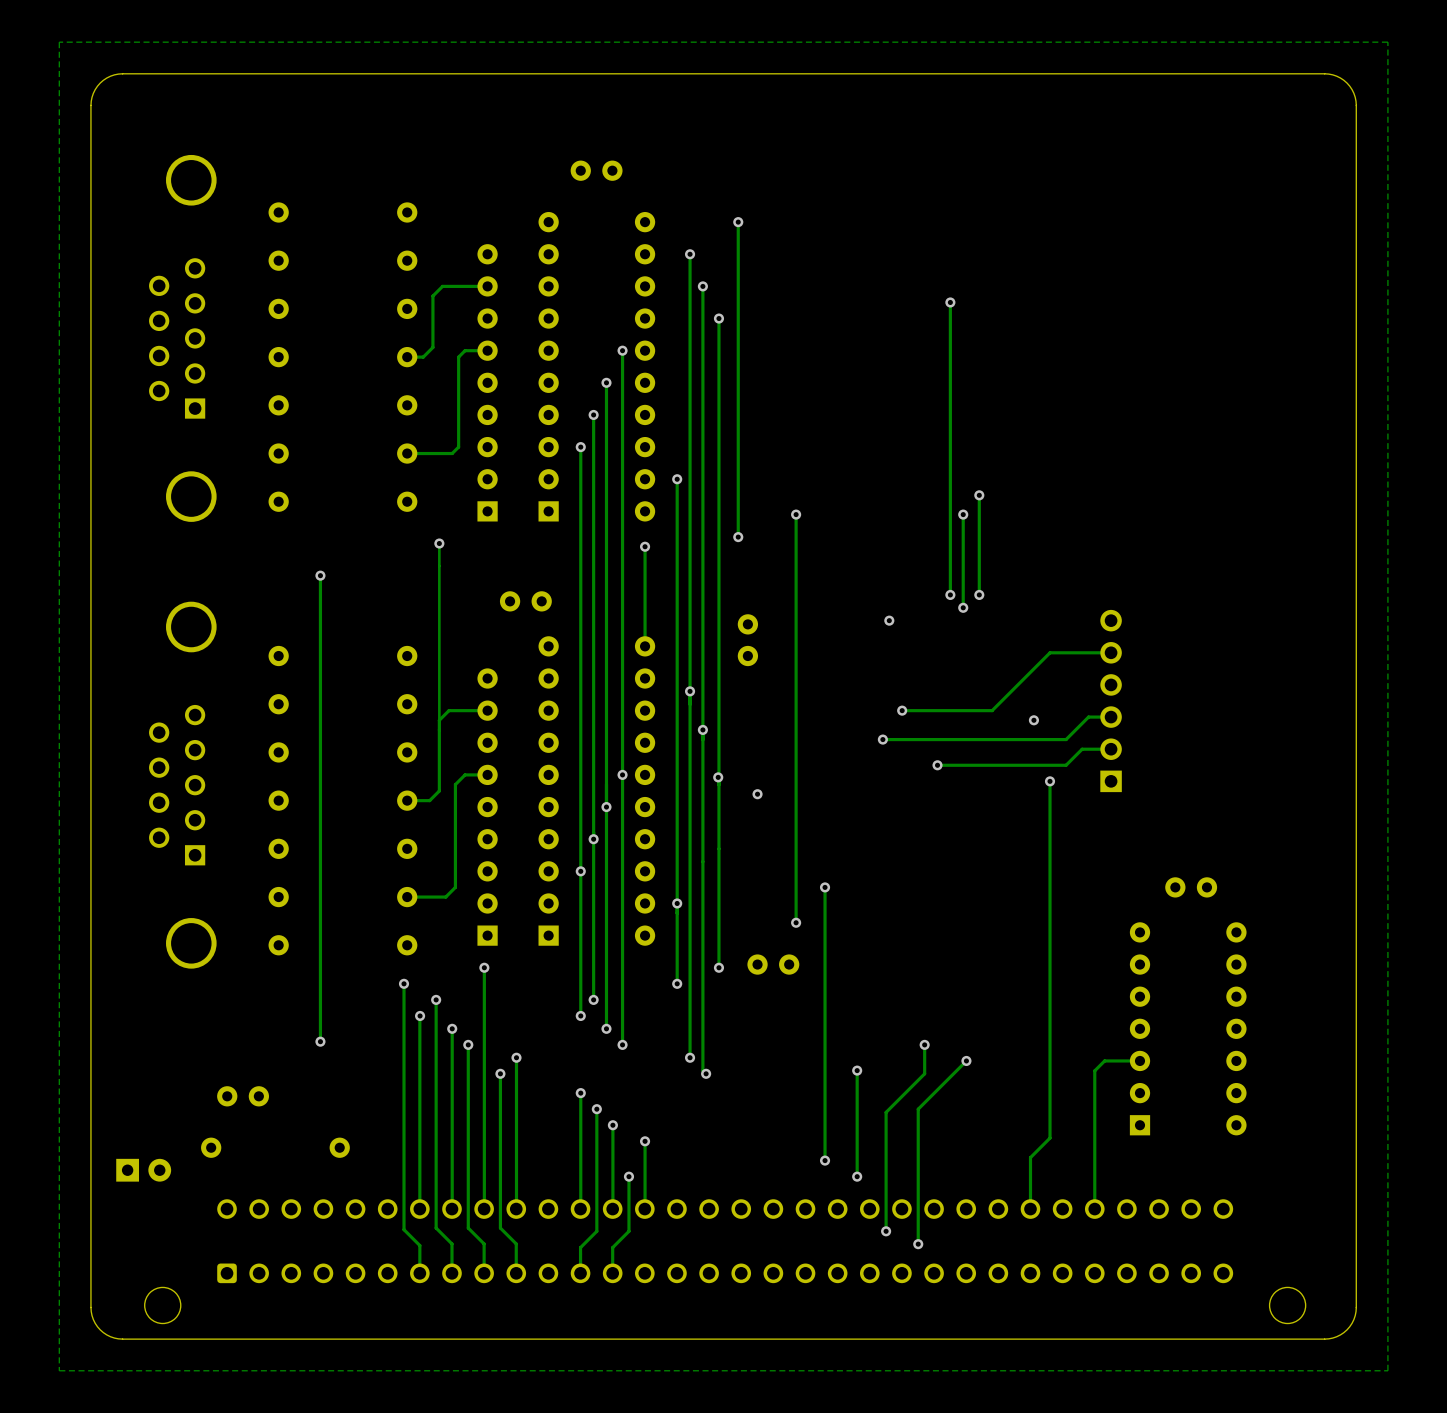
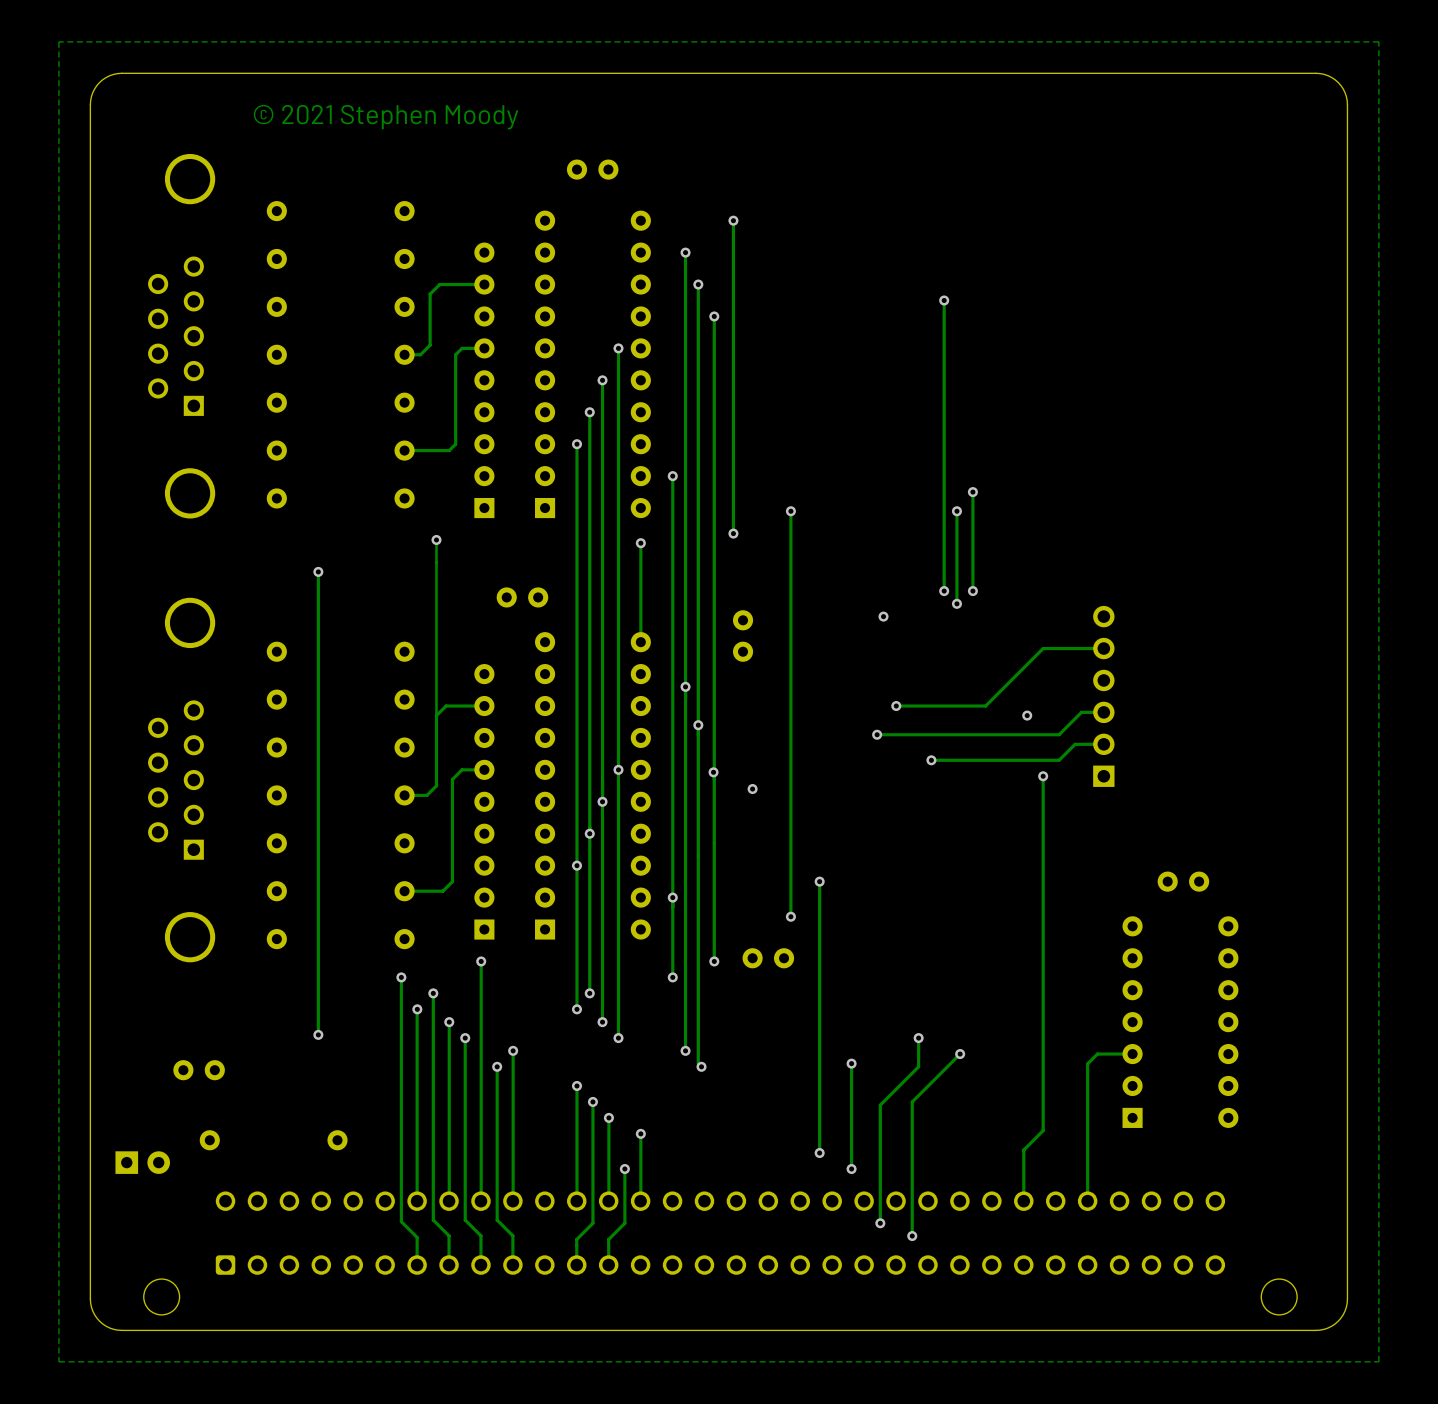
text: none -> © 2021 Stephen Moody (386, 117)
part position: (243, 1096) -> (199, 1070)

